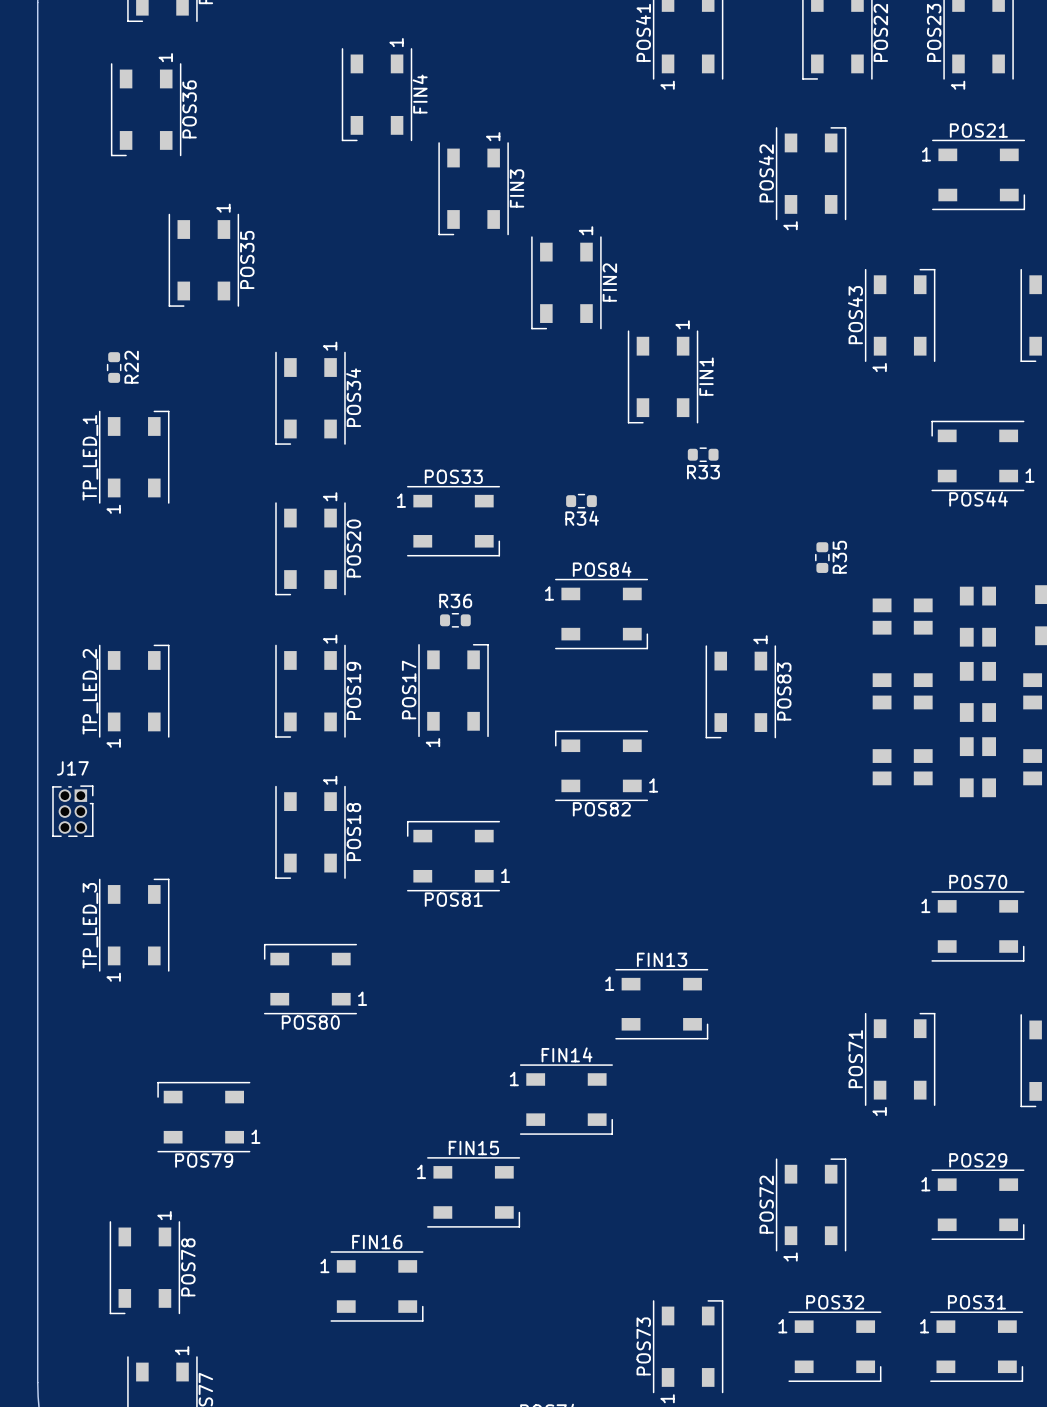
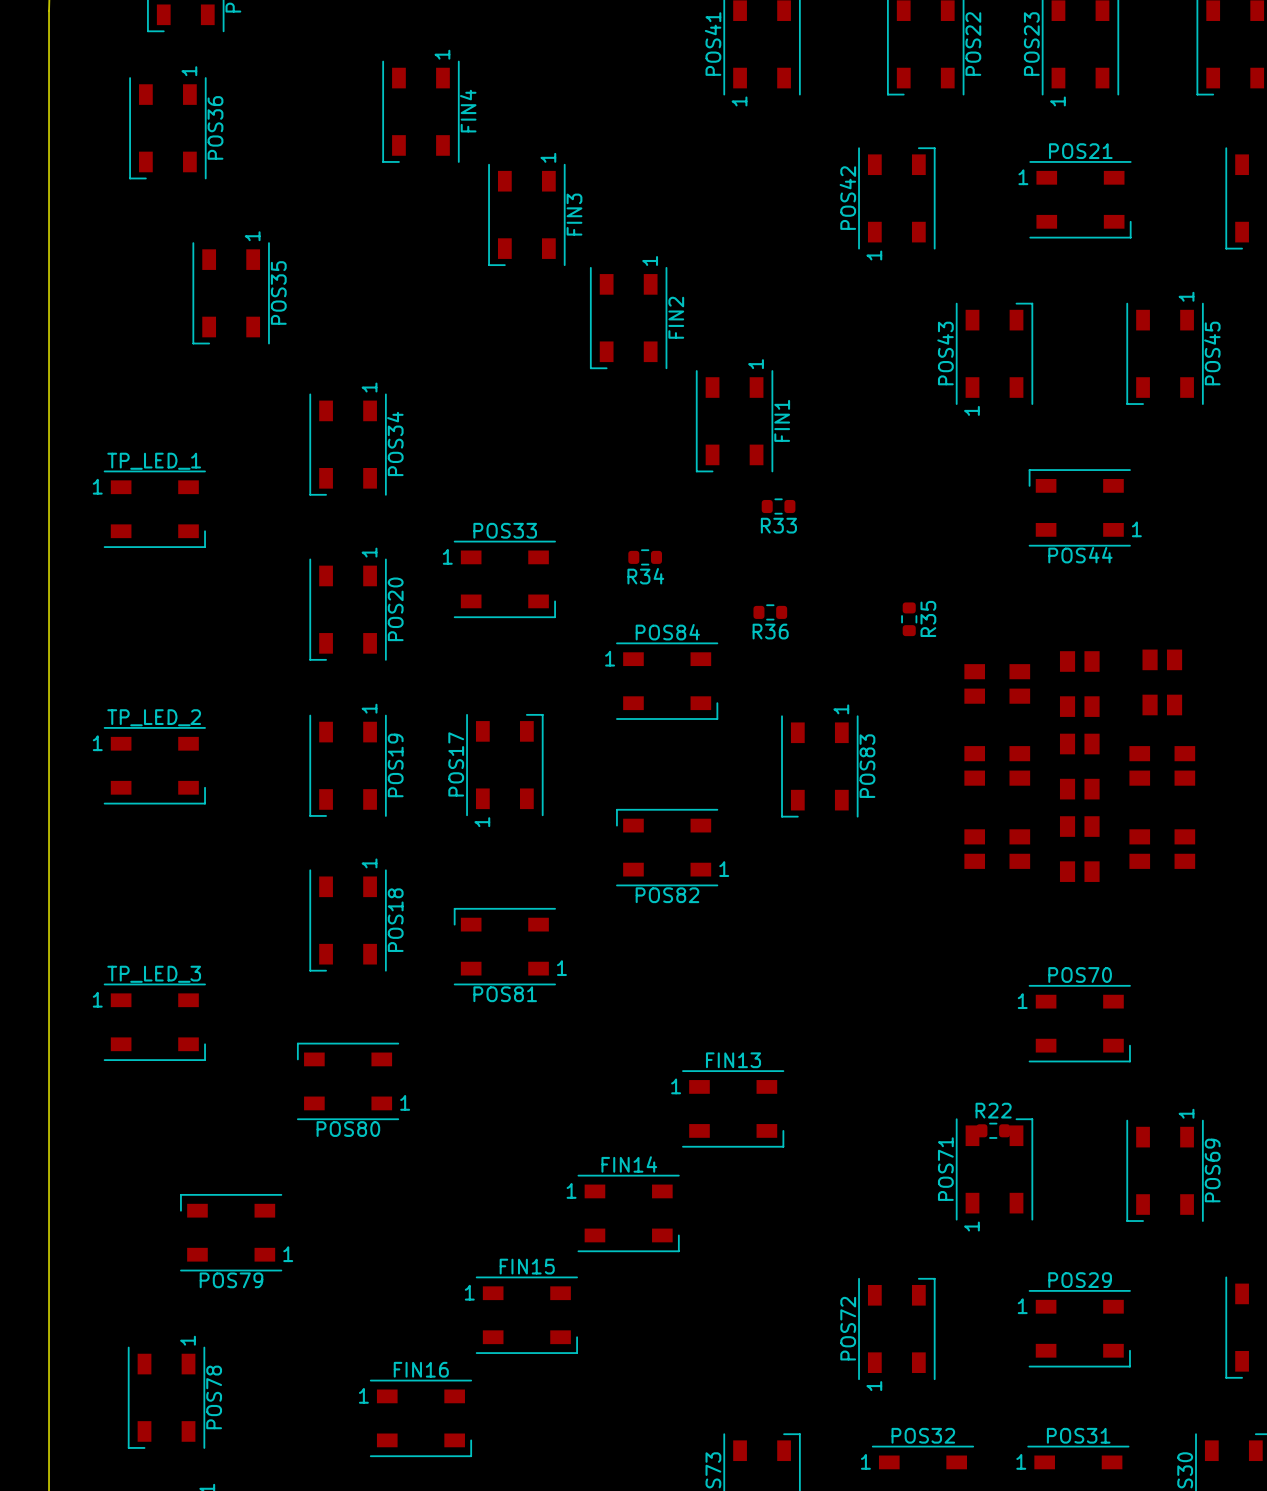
R22 rotation: 0° (114, 367) -> 90° clockwise (993, 1130)
R22 position: (114, 367) -> (993, 1130)
R22 name position: R22 (131, 367) -> R22 (993, 1110)
TP_LED_1 rotation: 0° (134, 457) -> 90° clockwise (154, 509)
R36 name position: R36 (455, 601) -> R36 (770, 631)
R36 position: (455, 620) -> (770, 612)
TP_LED_2 rotation: 0° (134, 691) -> 90° clockwise (154, 765)
J17: (72, 811) -> none
TP_LED_3 rotation: 0° (134, 925) -> 90° clockwise (154, 1022)

